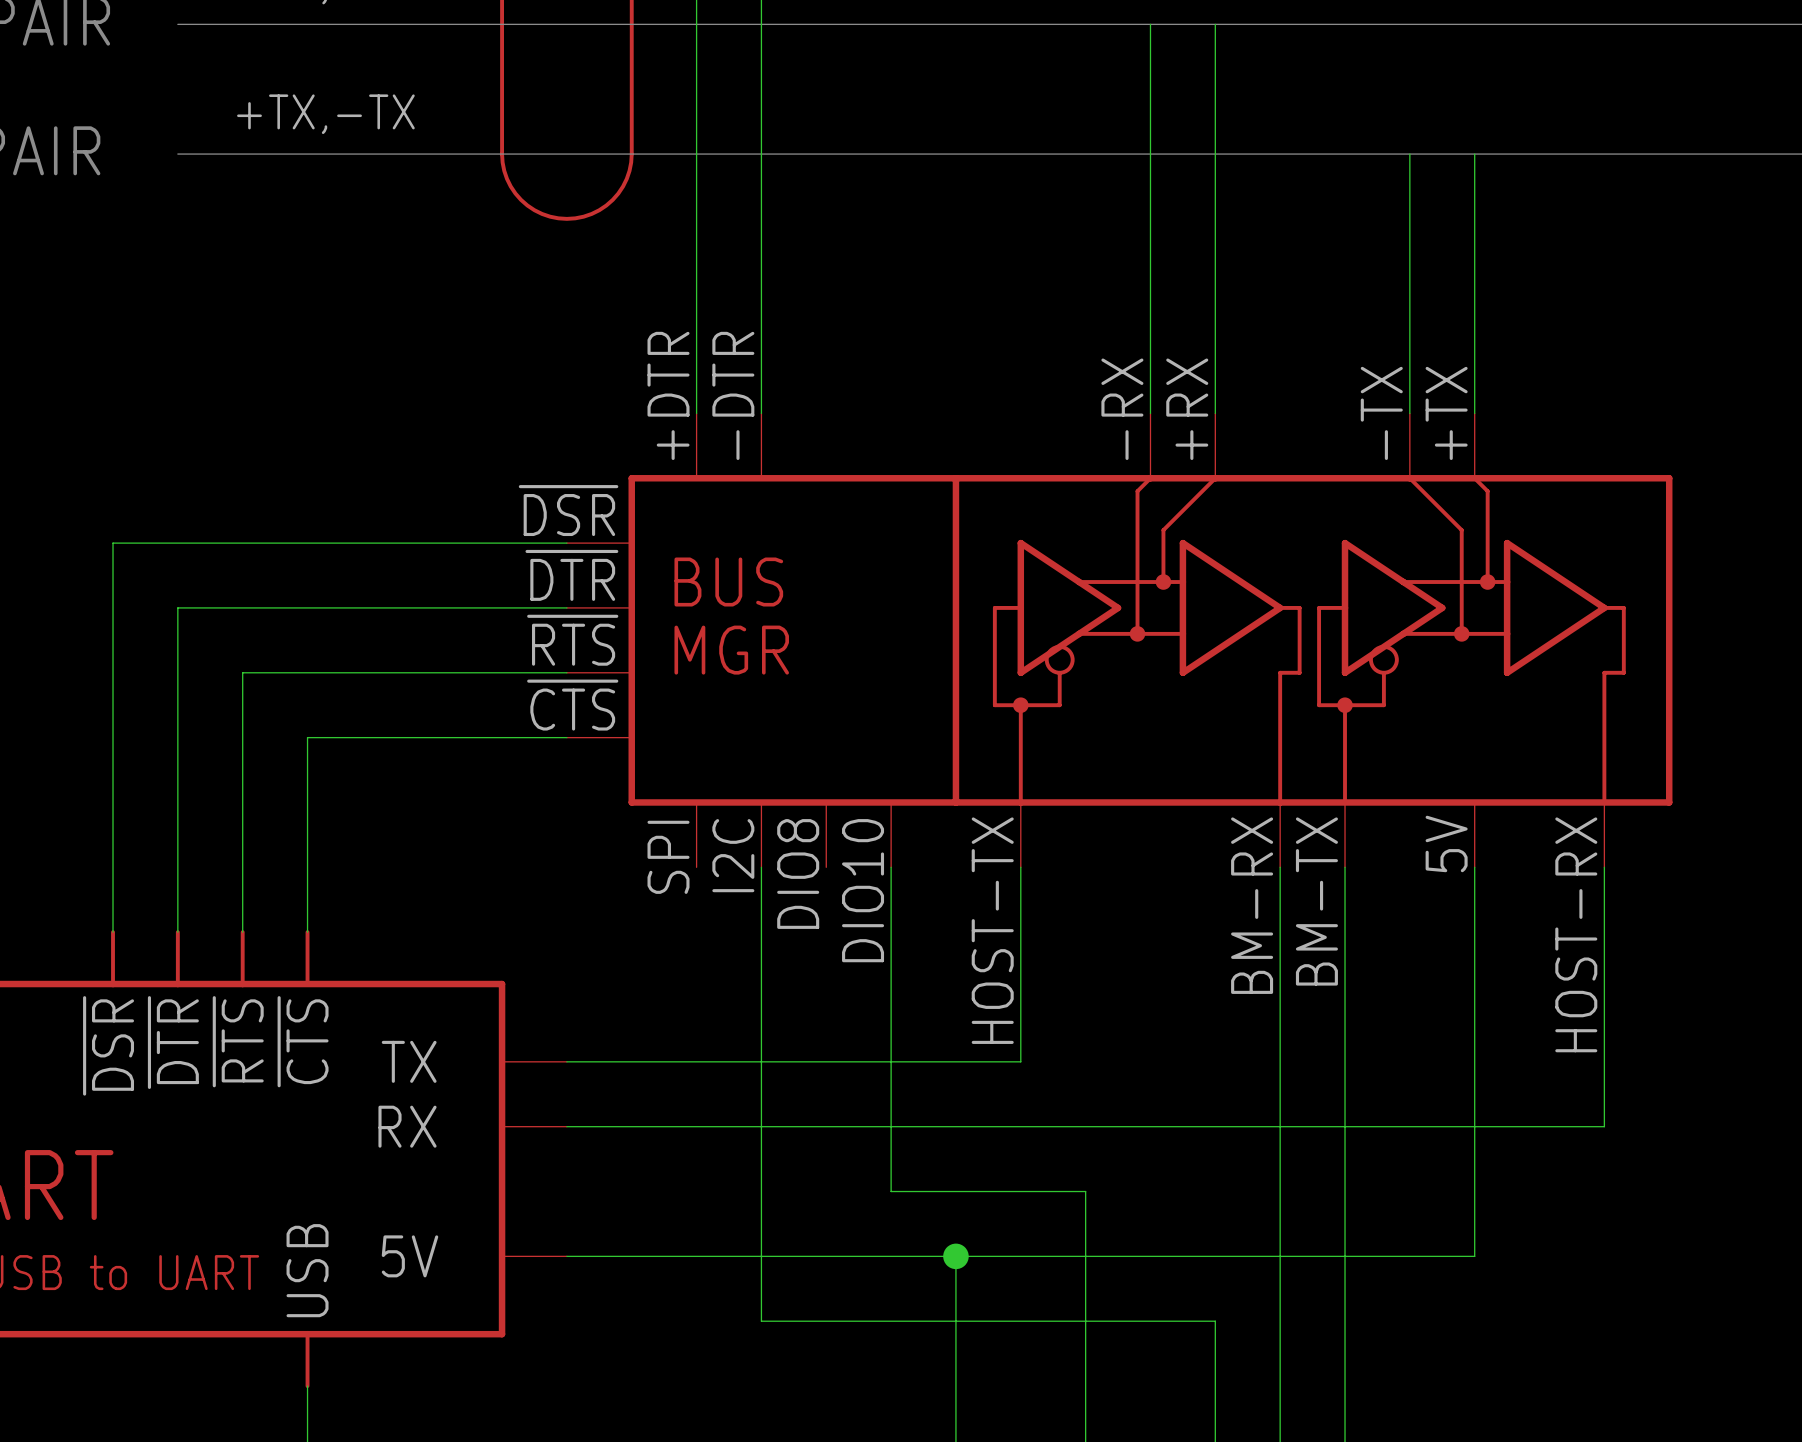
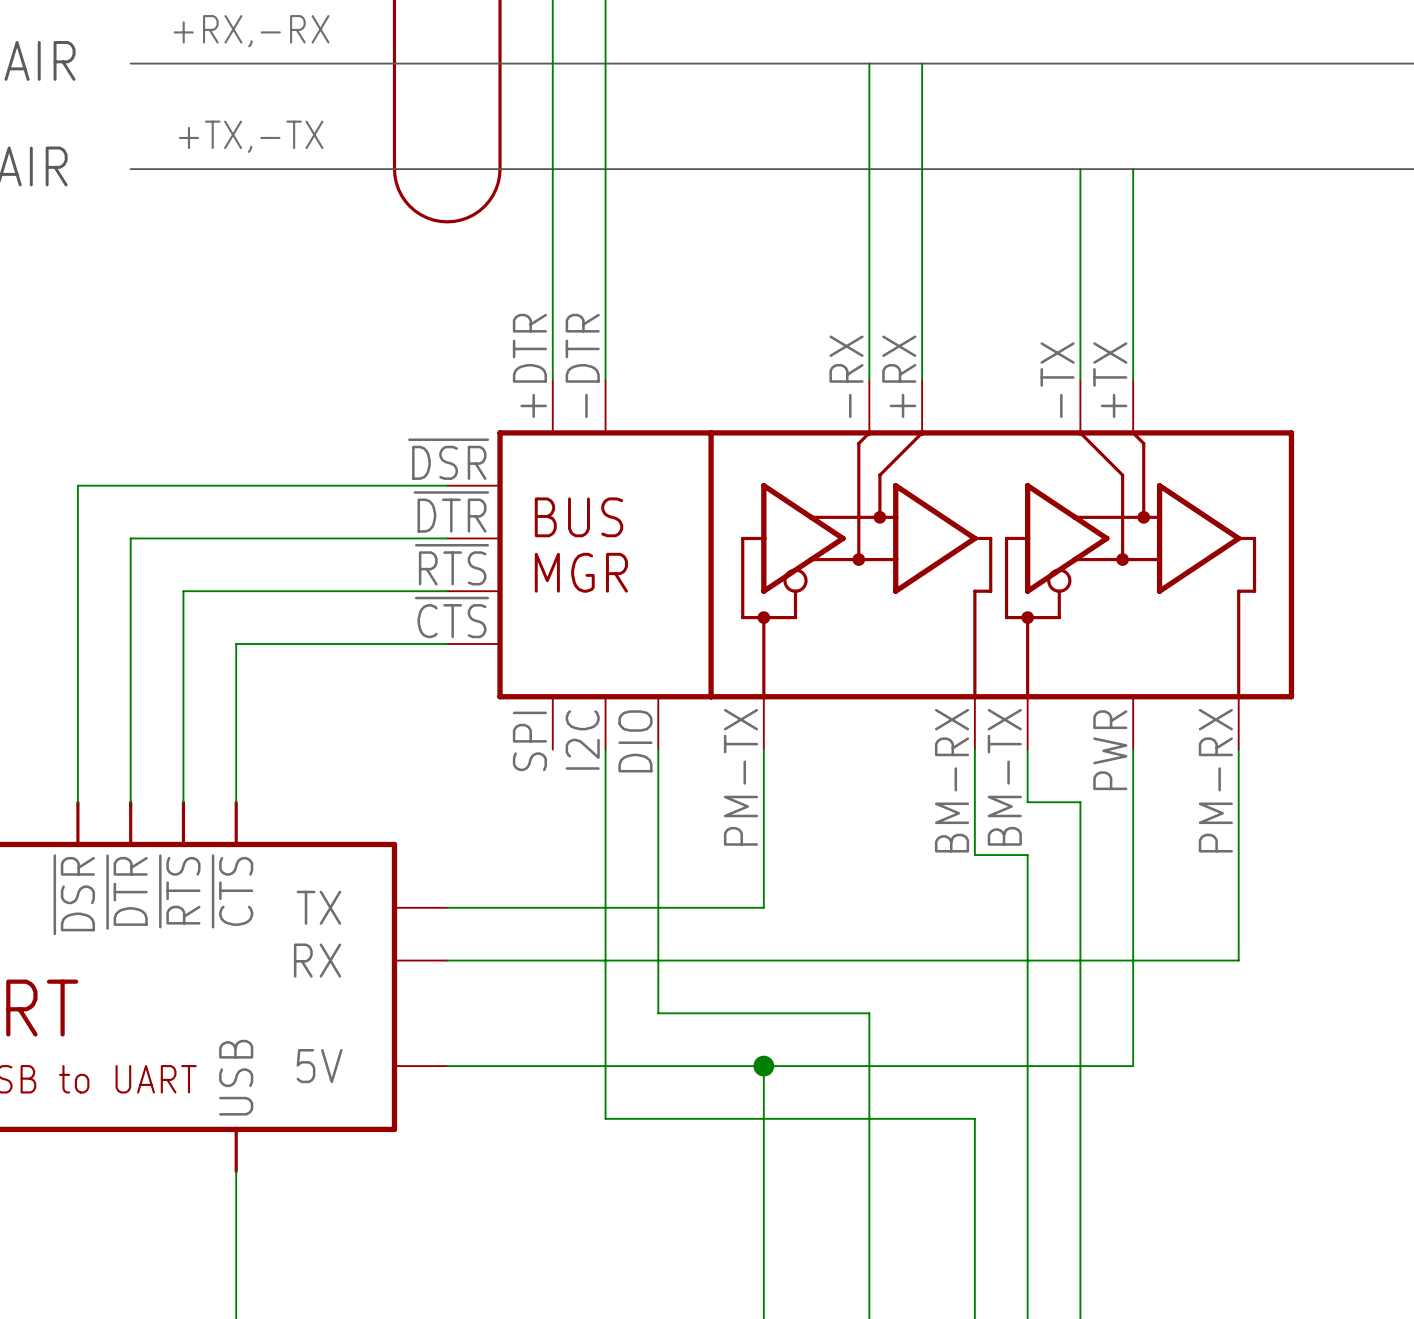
wire: (1215, 24) (1215, 413) -> (869, 63) (869, 380)
wire: (1474, 154) (1474, 413) -> (1080, 169) (1080, 380)
part: none -> (870, 564)
part: (1119, 640) -> none
wire: (891, 867) (891, 1191) -> (658, 749) (658, 1013) (711, 1013)
wire: (1020, 867) (1020, 1061) (955, 1061) -> (763, 749) (763, 907)
wire: (1345, 867) (1345, 932) -> (1027, 802) (1080, 802)
wire: (1474, 867) (1474, 1256) (1409, 1256) -> (1133, 749) (1133, 1066)
wire: (1604, 867) (1604, 1126) (1539, 1126) -> (1238, 749) (1238, 960)
wire: (1280, 932) (1280, 997) -> (974, 749) (974, 855) (1027, 855)

